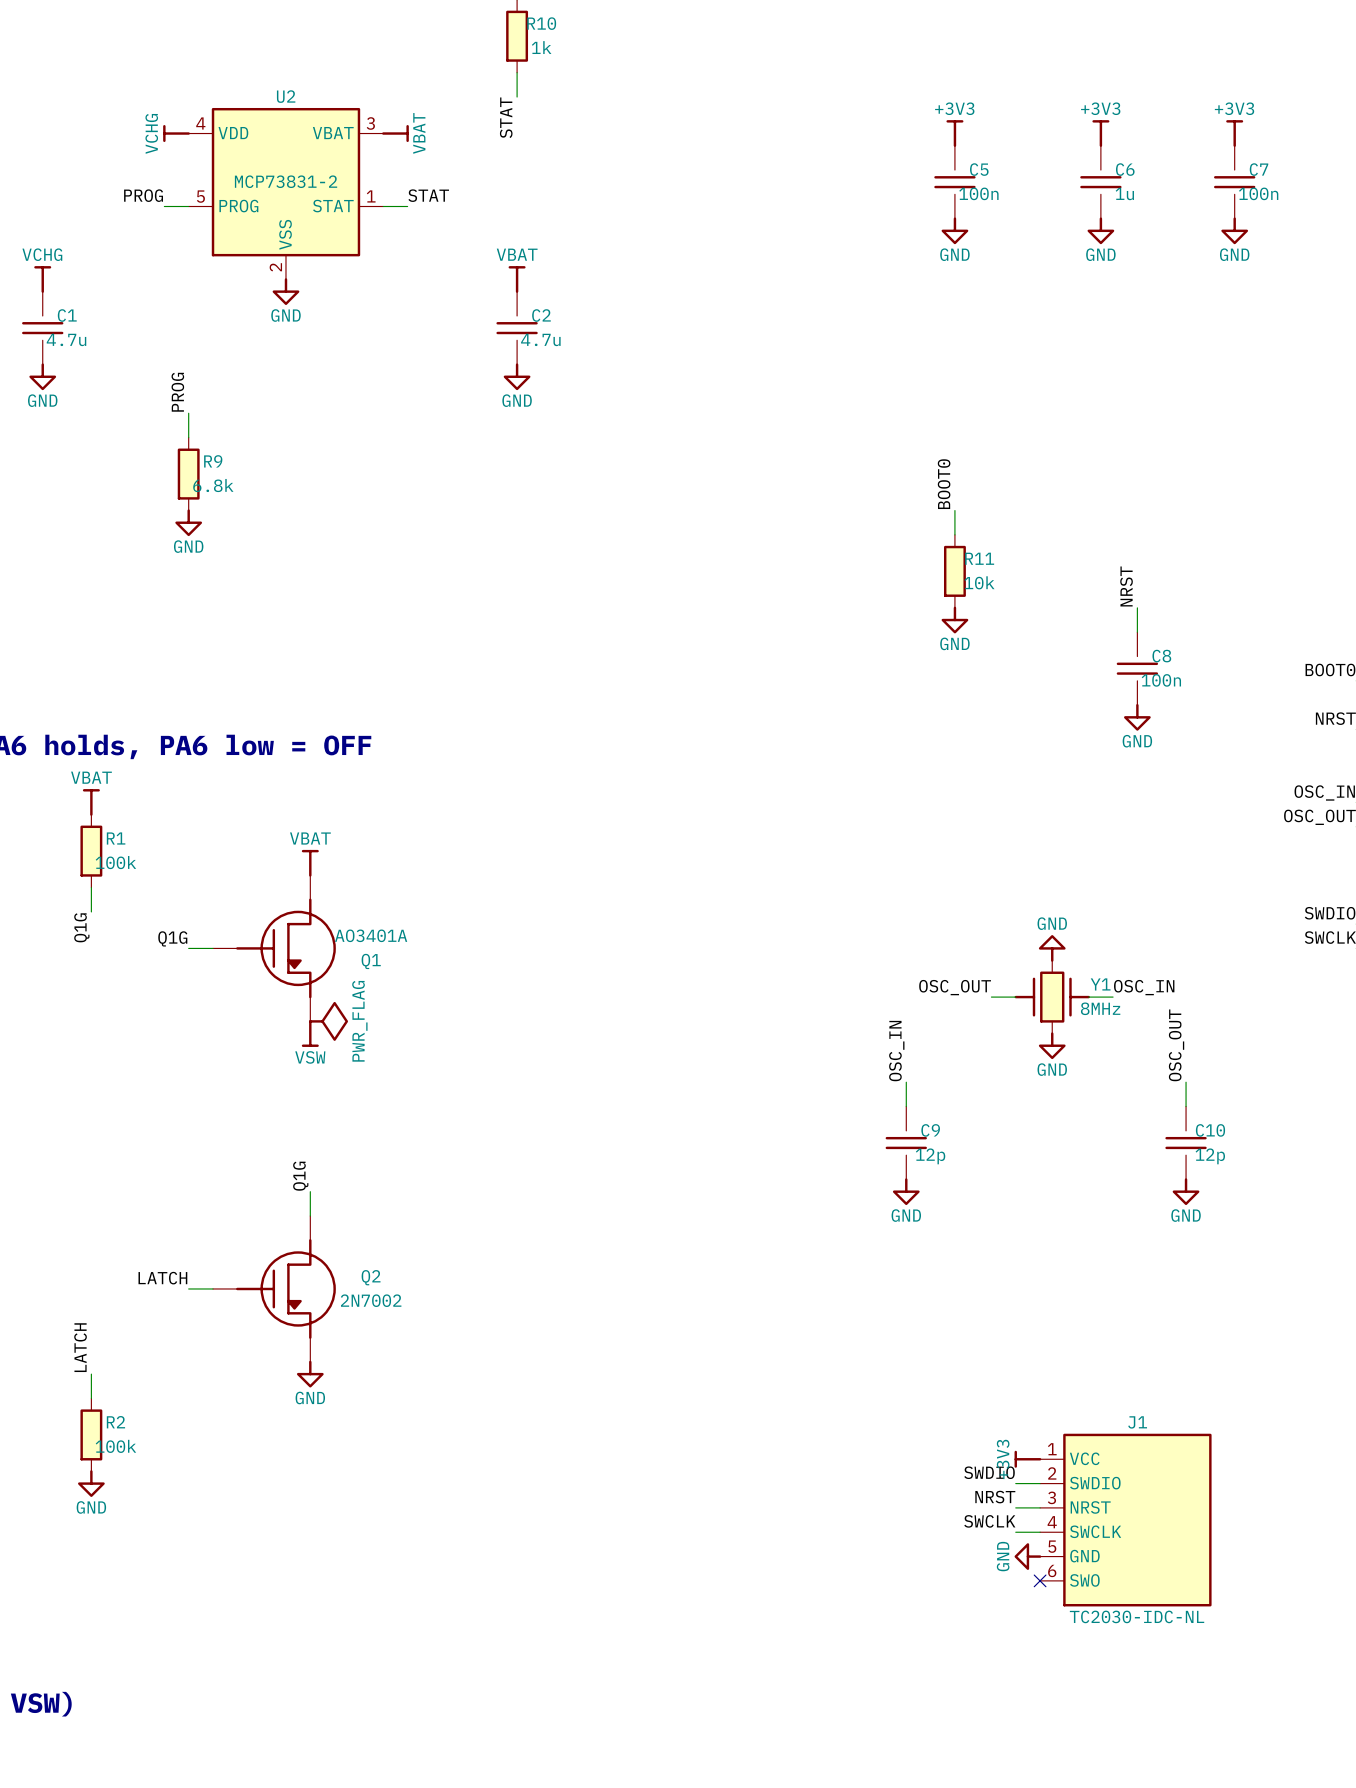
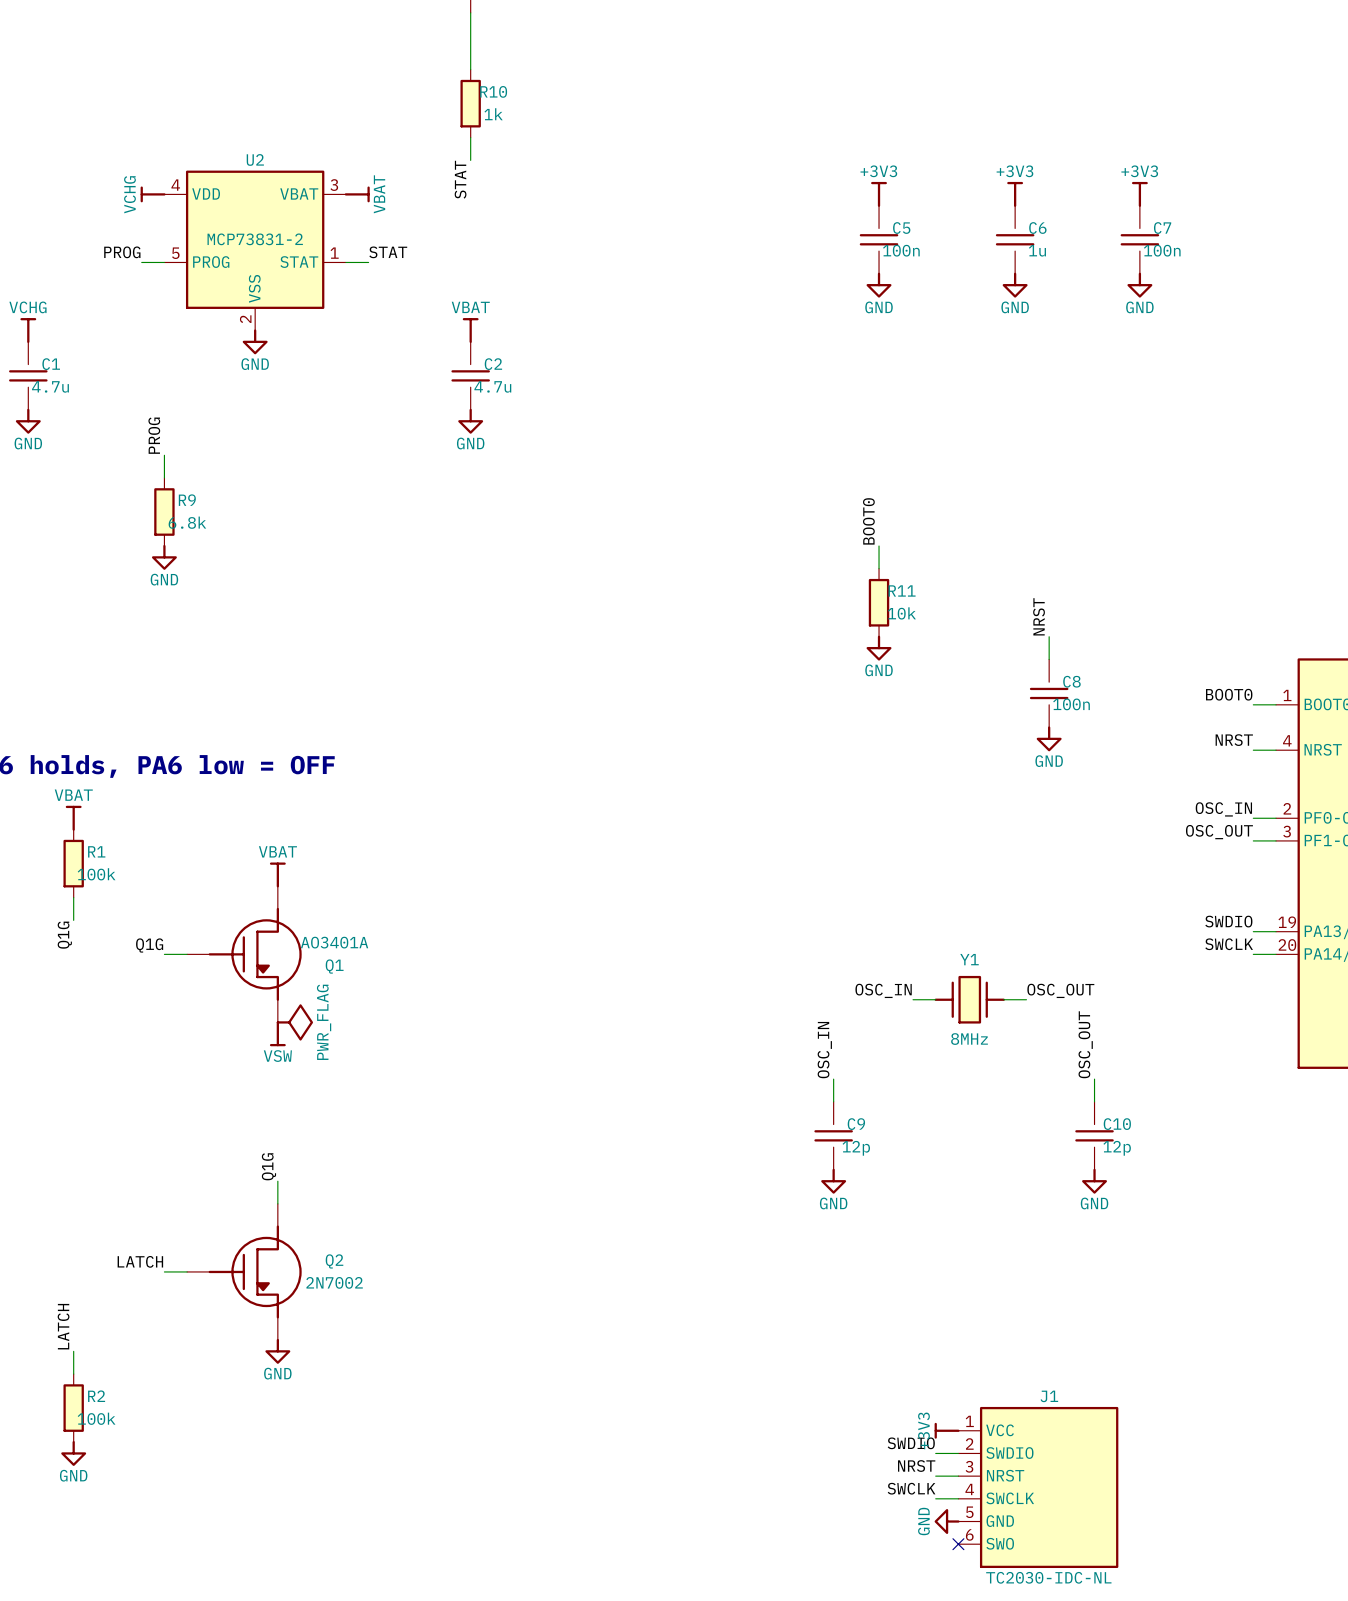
power symbol: GND (1052, 948) -> none
Y1 symbol: [1014, 960, 1090, 1034] -> [934, 975, 1005, 1024]
Y1 name position: Y1 (1100, 984) -> Y1 (969, 959)
label: OSC_OUT (955, 987) -> OSC_IN (883, 990)
label: OSC_IN (1144, 987) -> OSC_OUT (1060, 990)
Y1 value position: 8MHz (1100, 1008) -> 8MHz (969, 1039)
power symbol: GND (1052, 1045) -> none

